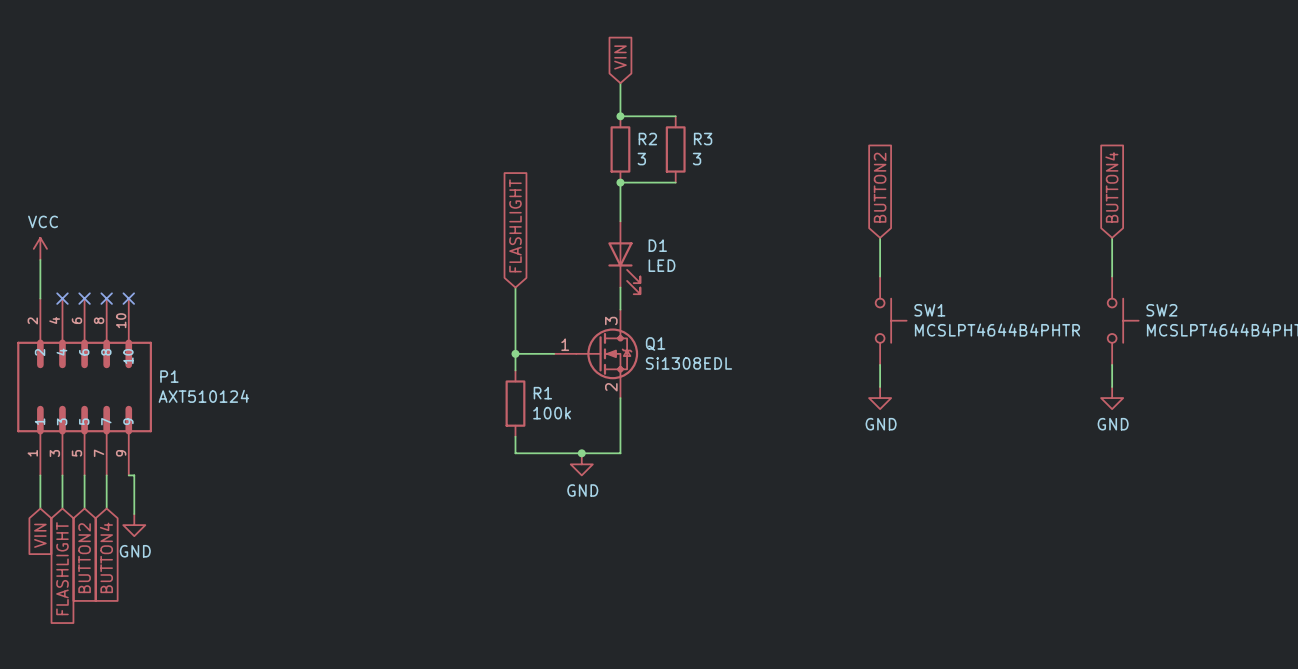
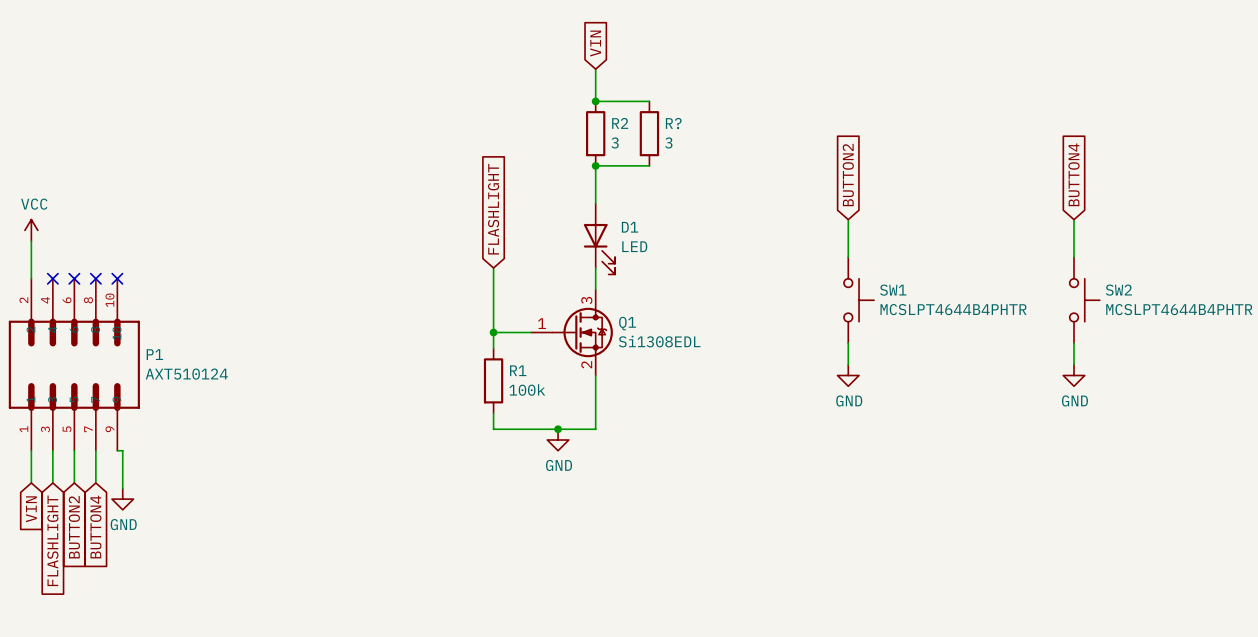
R3 name: R3 (703, 139) -> R? (673, 123)

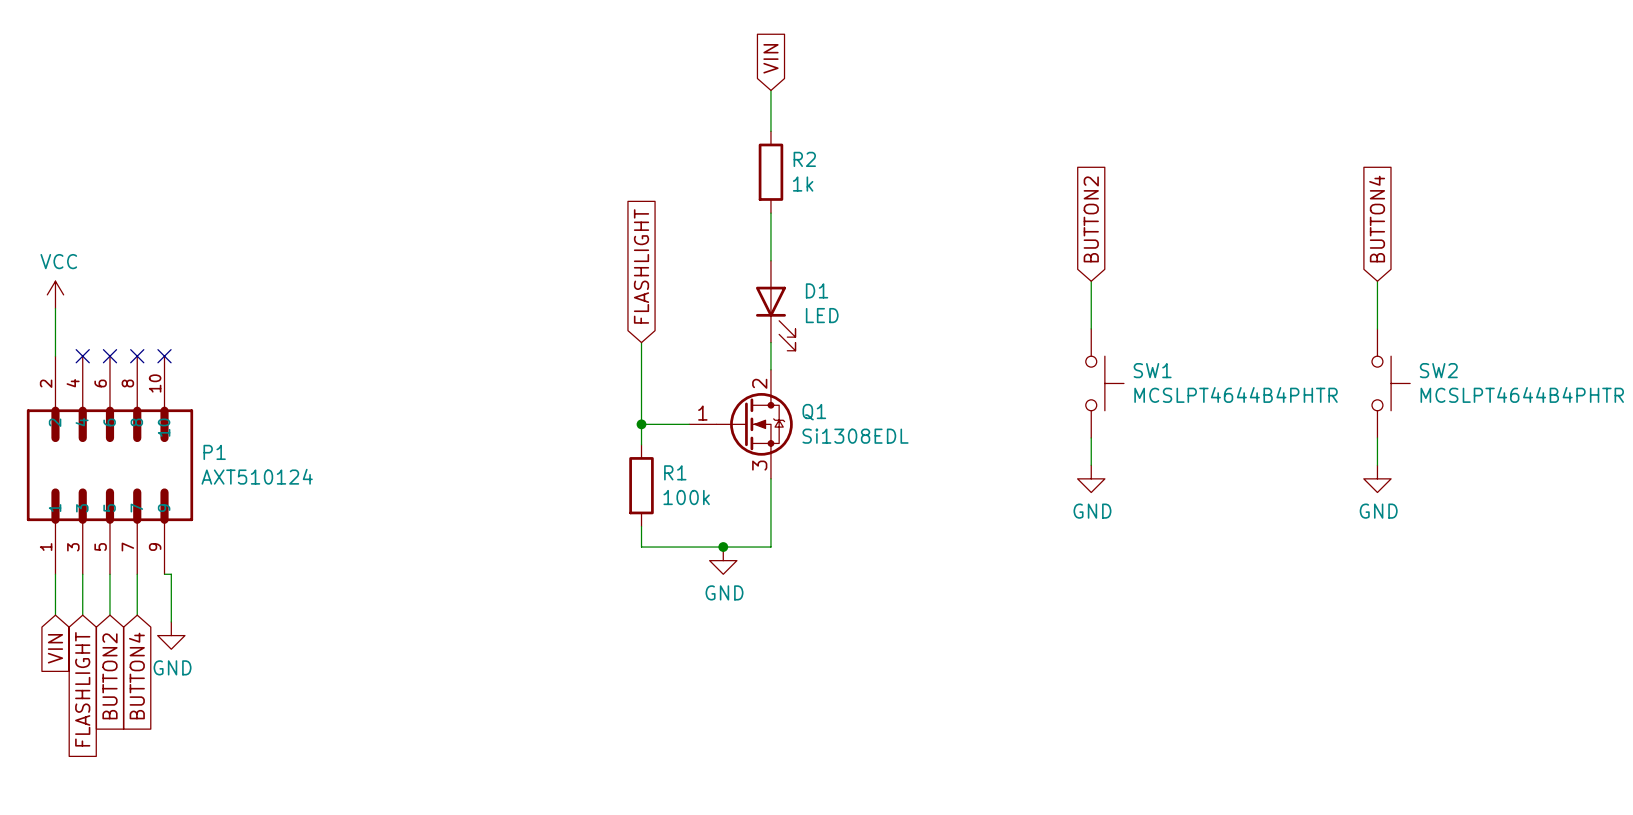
wire: (595, 101) (649, 101) -> none
junction: (595, 101) -> none
R?: 3 (649, 133) -> none
R2 value: 3 (615, 142) -> 1k (803, 184)
wire: (595, 165) (649, 165) -> none
junction: (595, 165) -> none
Q1 pin number: 3 (586, 300) -> 2 (759, 383)
Q1 pin number: 2 (586, 364) -> 3 (759, 465)

